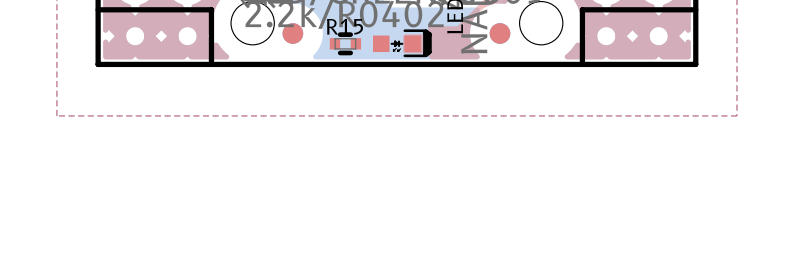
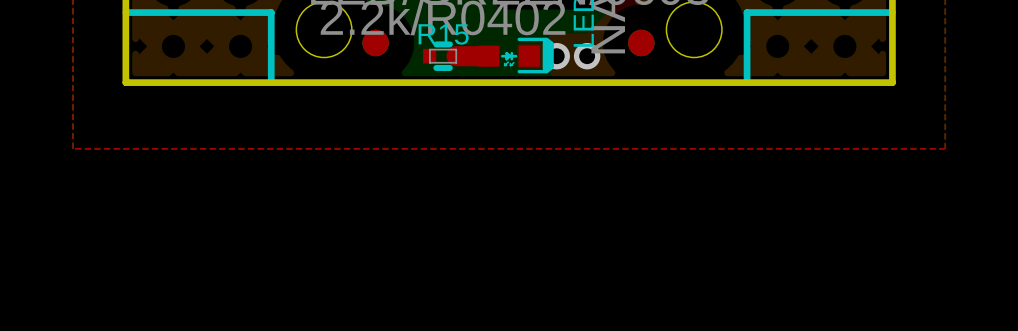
top track: none -> (456, 56) (489, 56)
via: none -> (556, 56)
via: none -> (587, 56)

